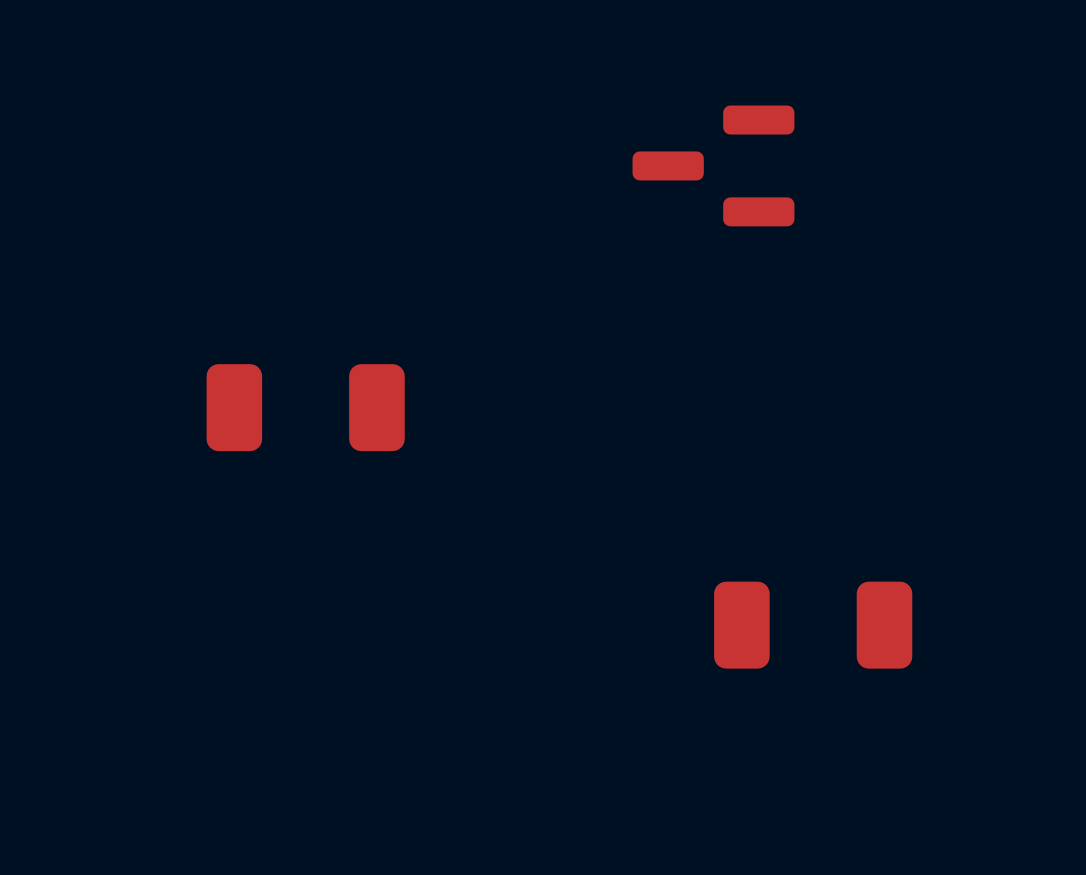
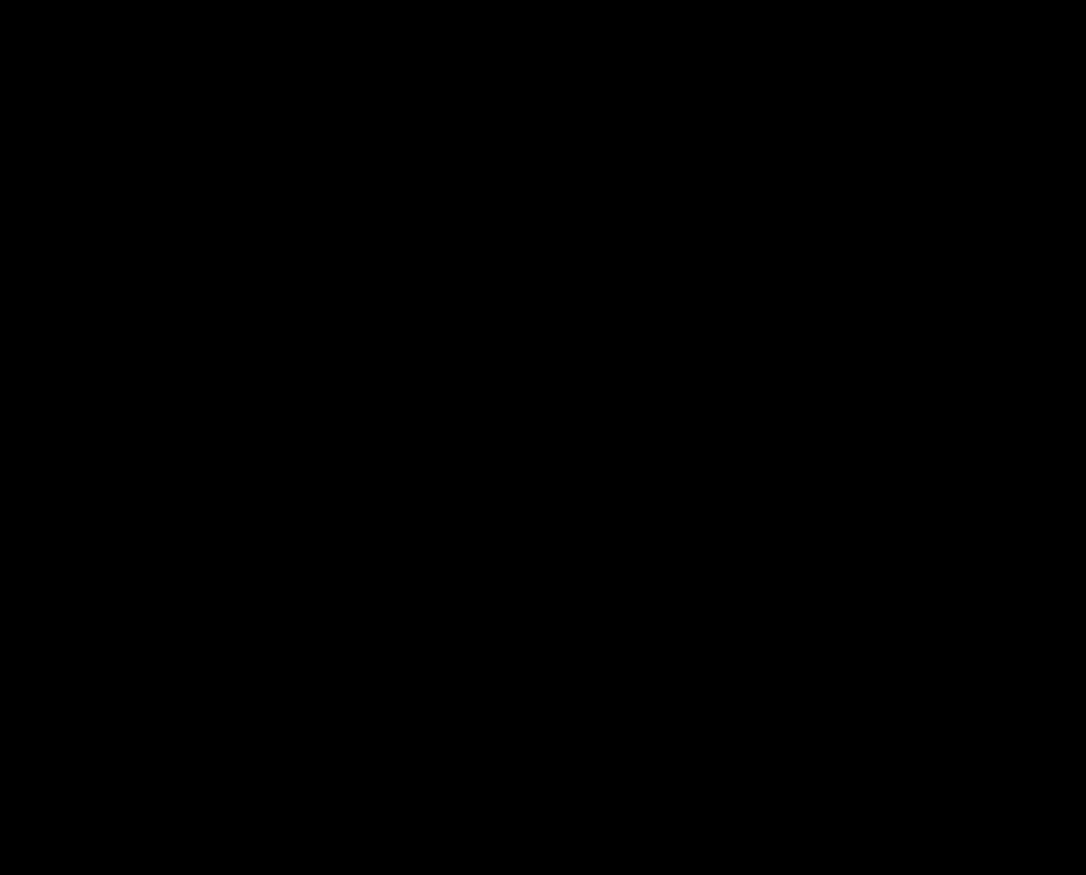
part: (713, 165) -> none
part: (305, 407) -> none
part: (813, 625) -> none

